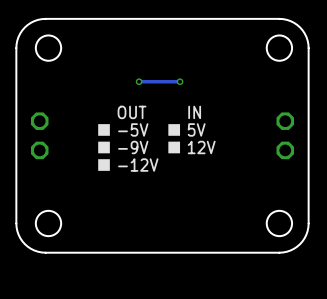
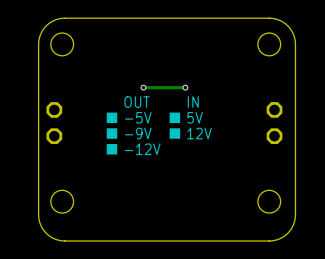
board edge: (51, 18) (38, 19) (27, 24) (20, 33) (16, 44) (16, 223) (18, 234) (27, 246) (45, 252) (283, 252) (300, 244) (306, 234) (308, 223) -> (64, 18) (54, 20) (46, 25) (38, 40) (38, 214) (40, 224) (48, 235) (64, 241) (272, 240) (285, 235) (291, 227) (295, 218) (295, 201)
via position: (139, 81) -> (143, 87)
track: (180, 81) (139, 81) -> none
via position: (180, 81) -> (185, 87)
track: none -> (185, 87) (143, 87)

